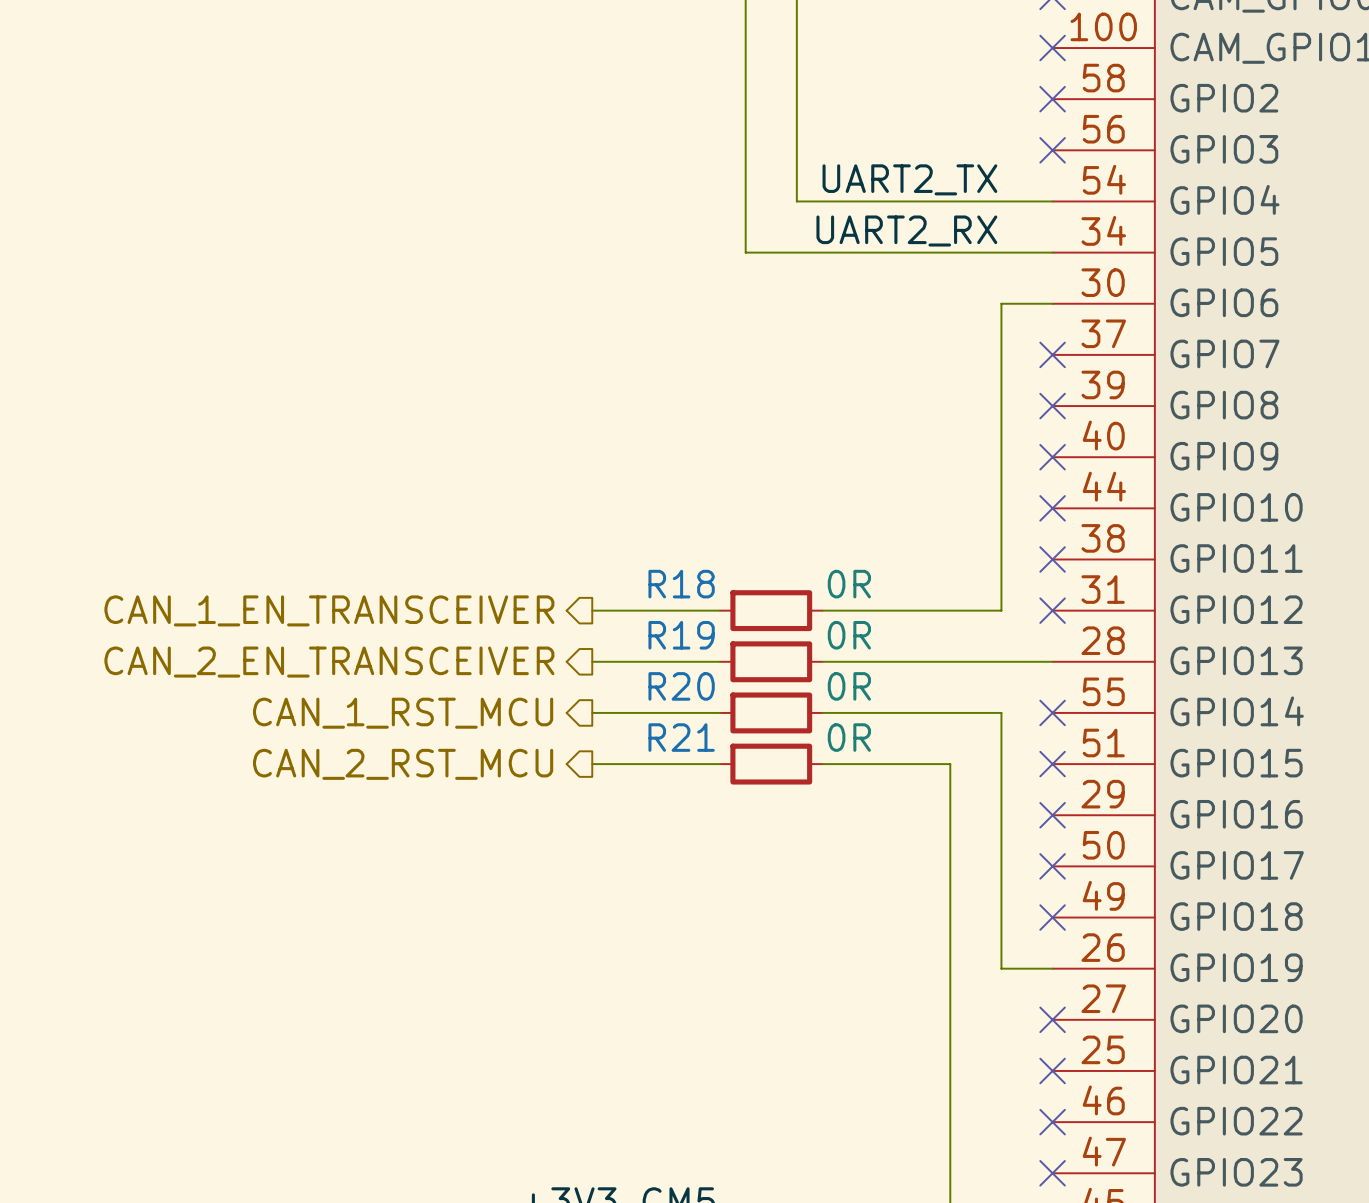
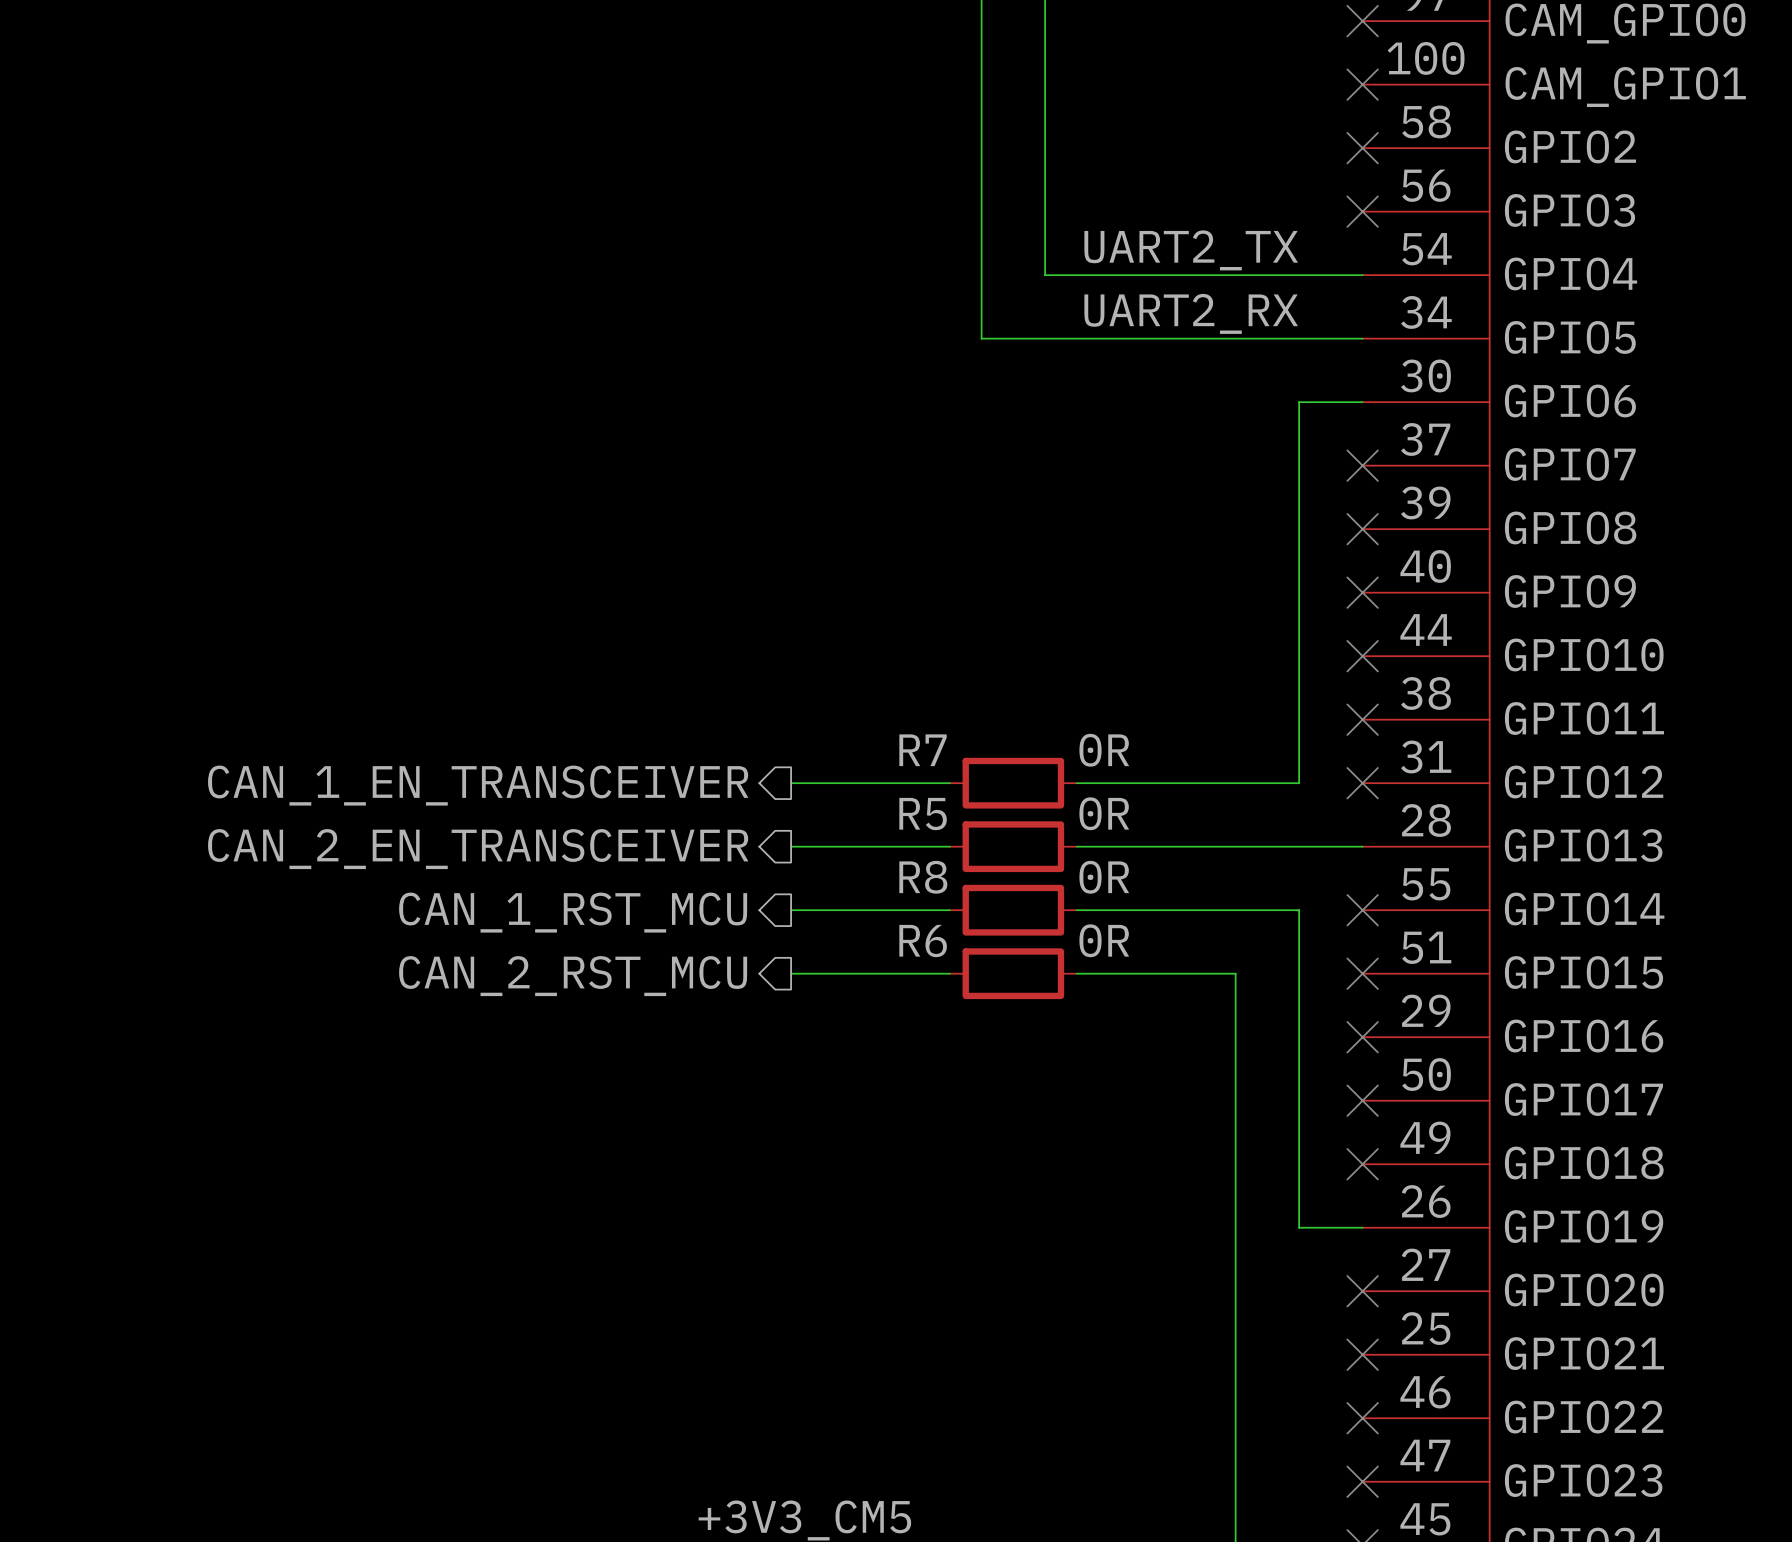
R18 name: R18 (681, 584) -> R7 (923, 750)
R19 name: R19 (681, 635) -> R5 (923, 814)
R20 name: R20 (681, 686) -> R8 (923, 877)
R21 name: R21 (681, 737) -> R6 (923, 941)

